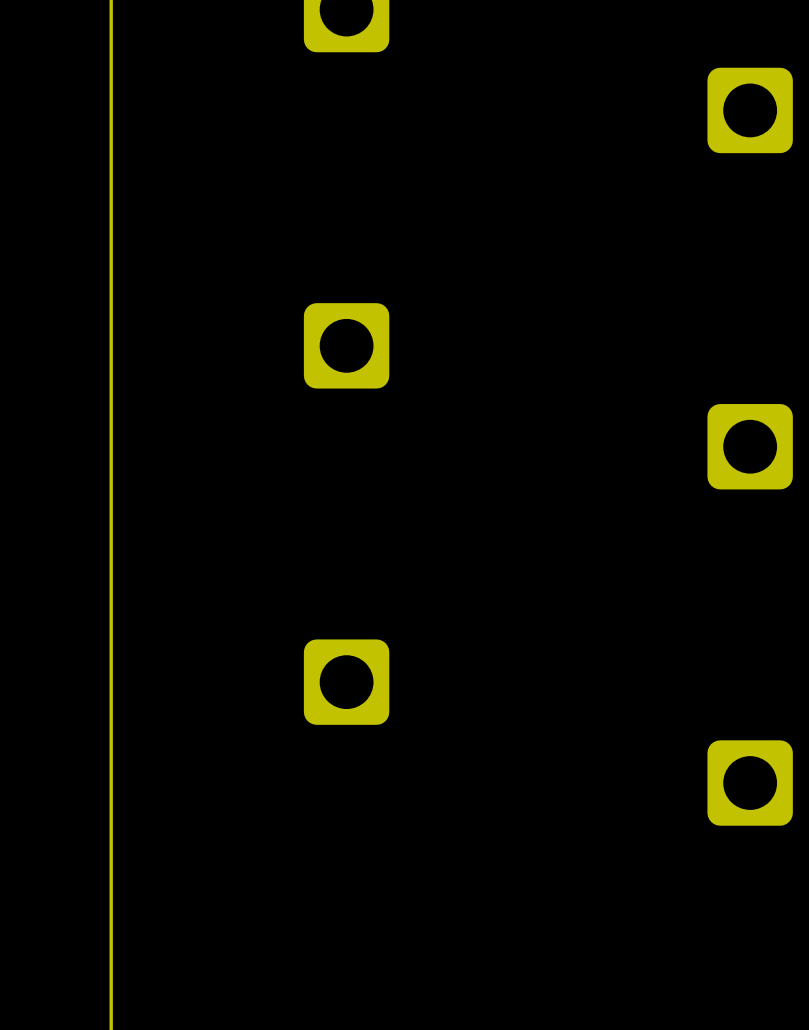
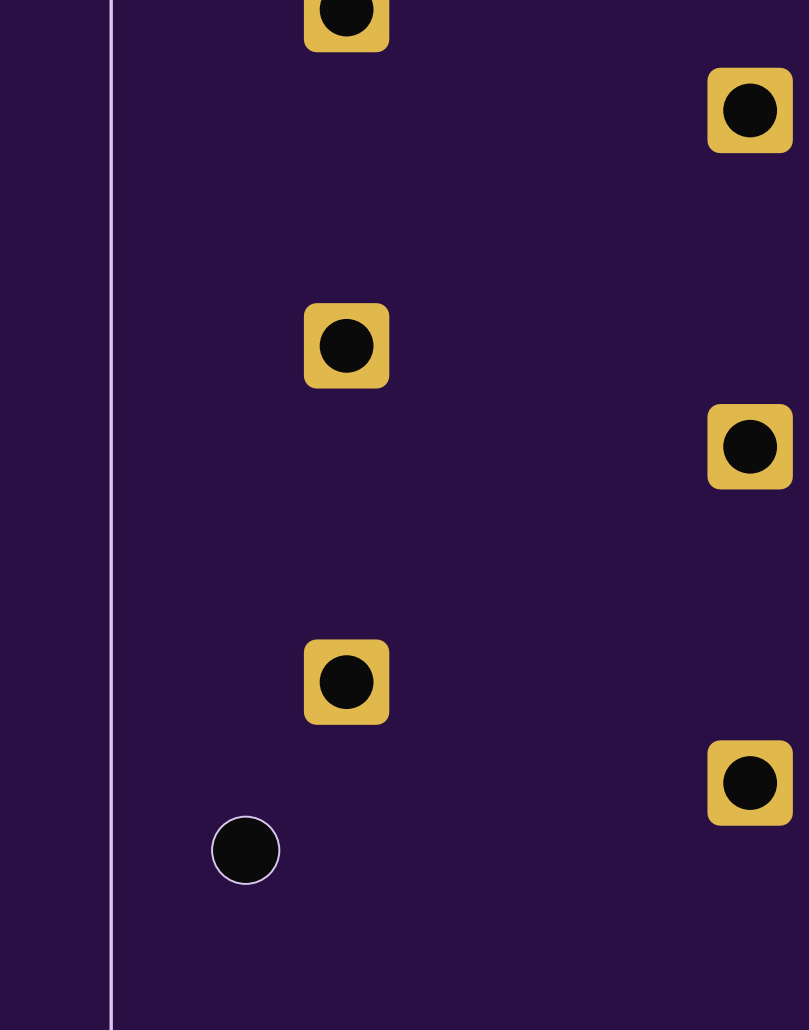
part: none -> (245, 850)

